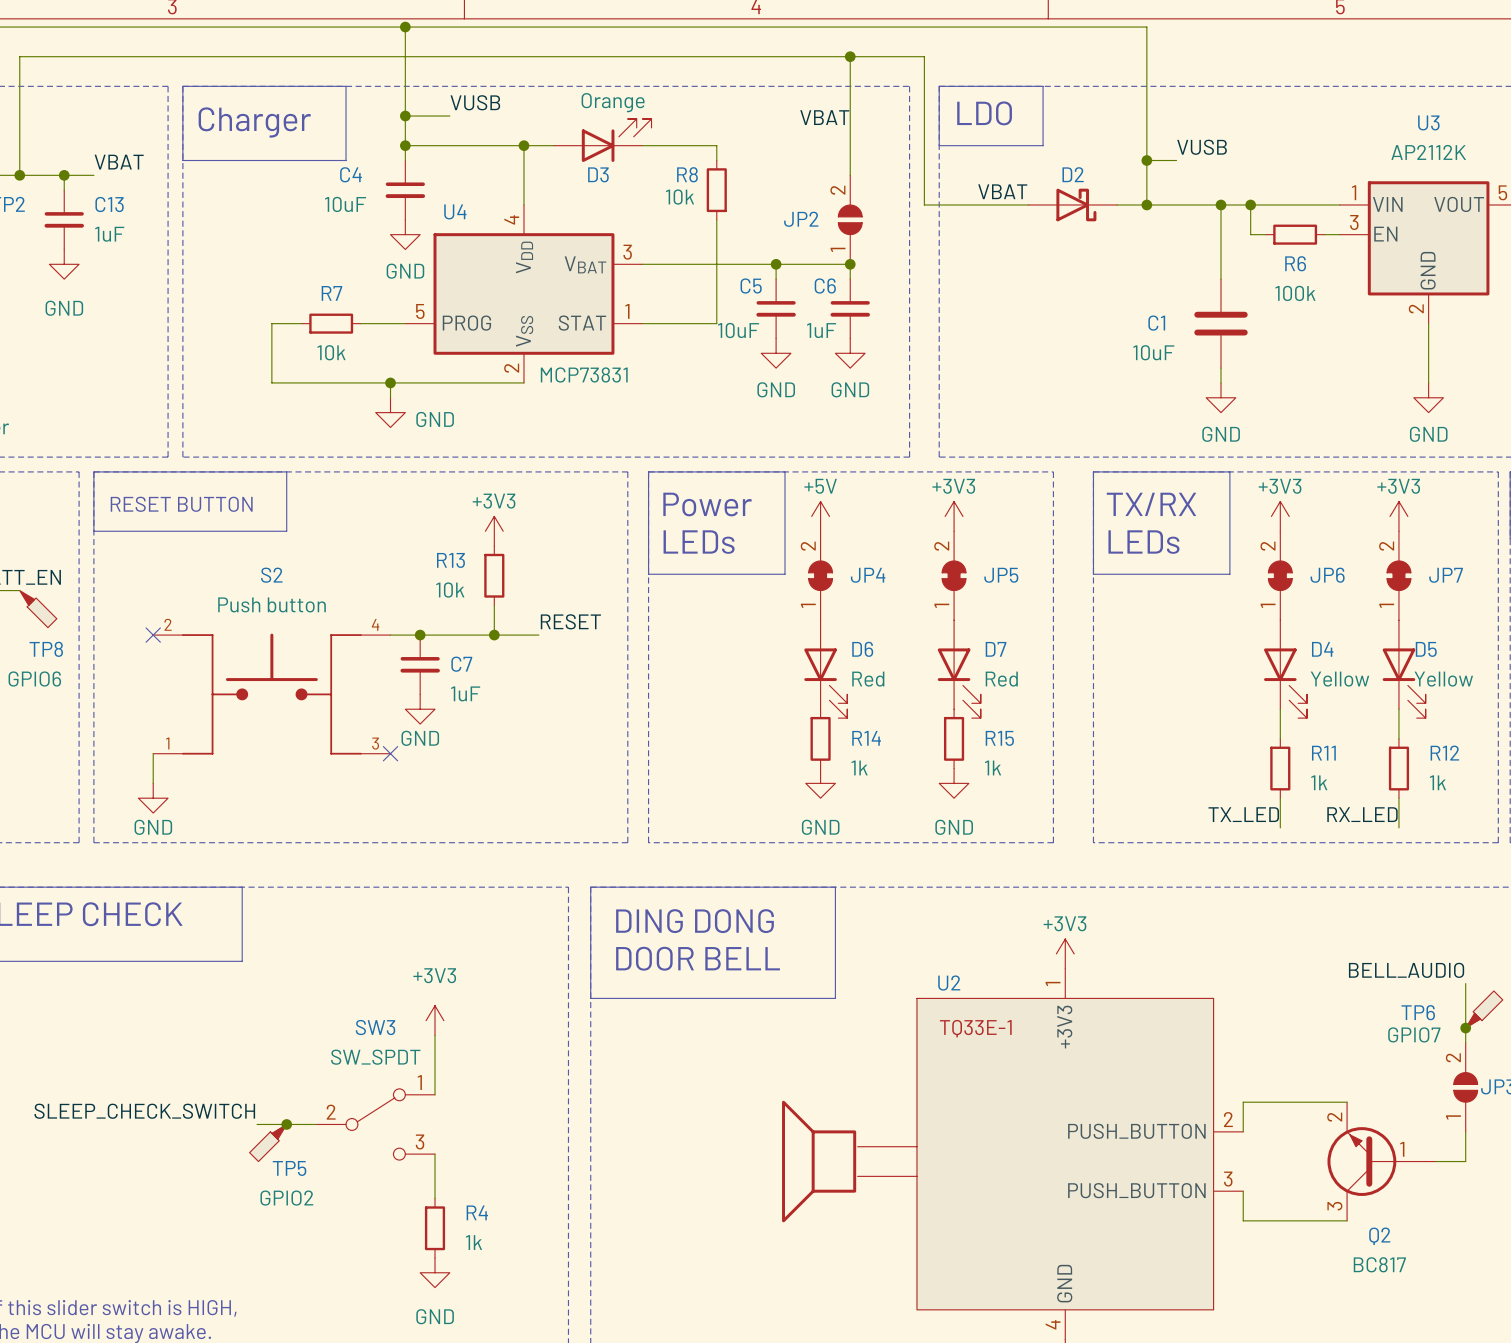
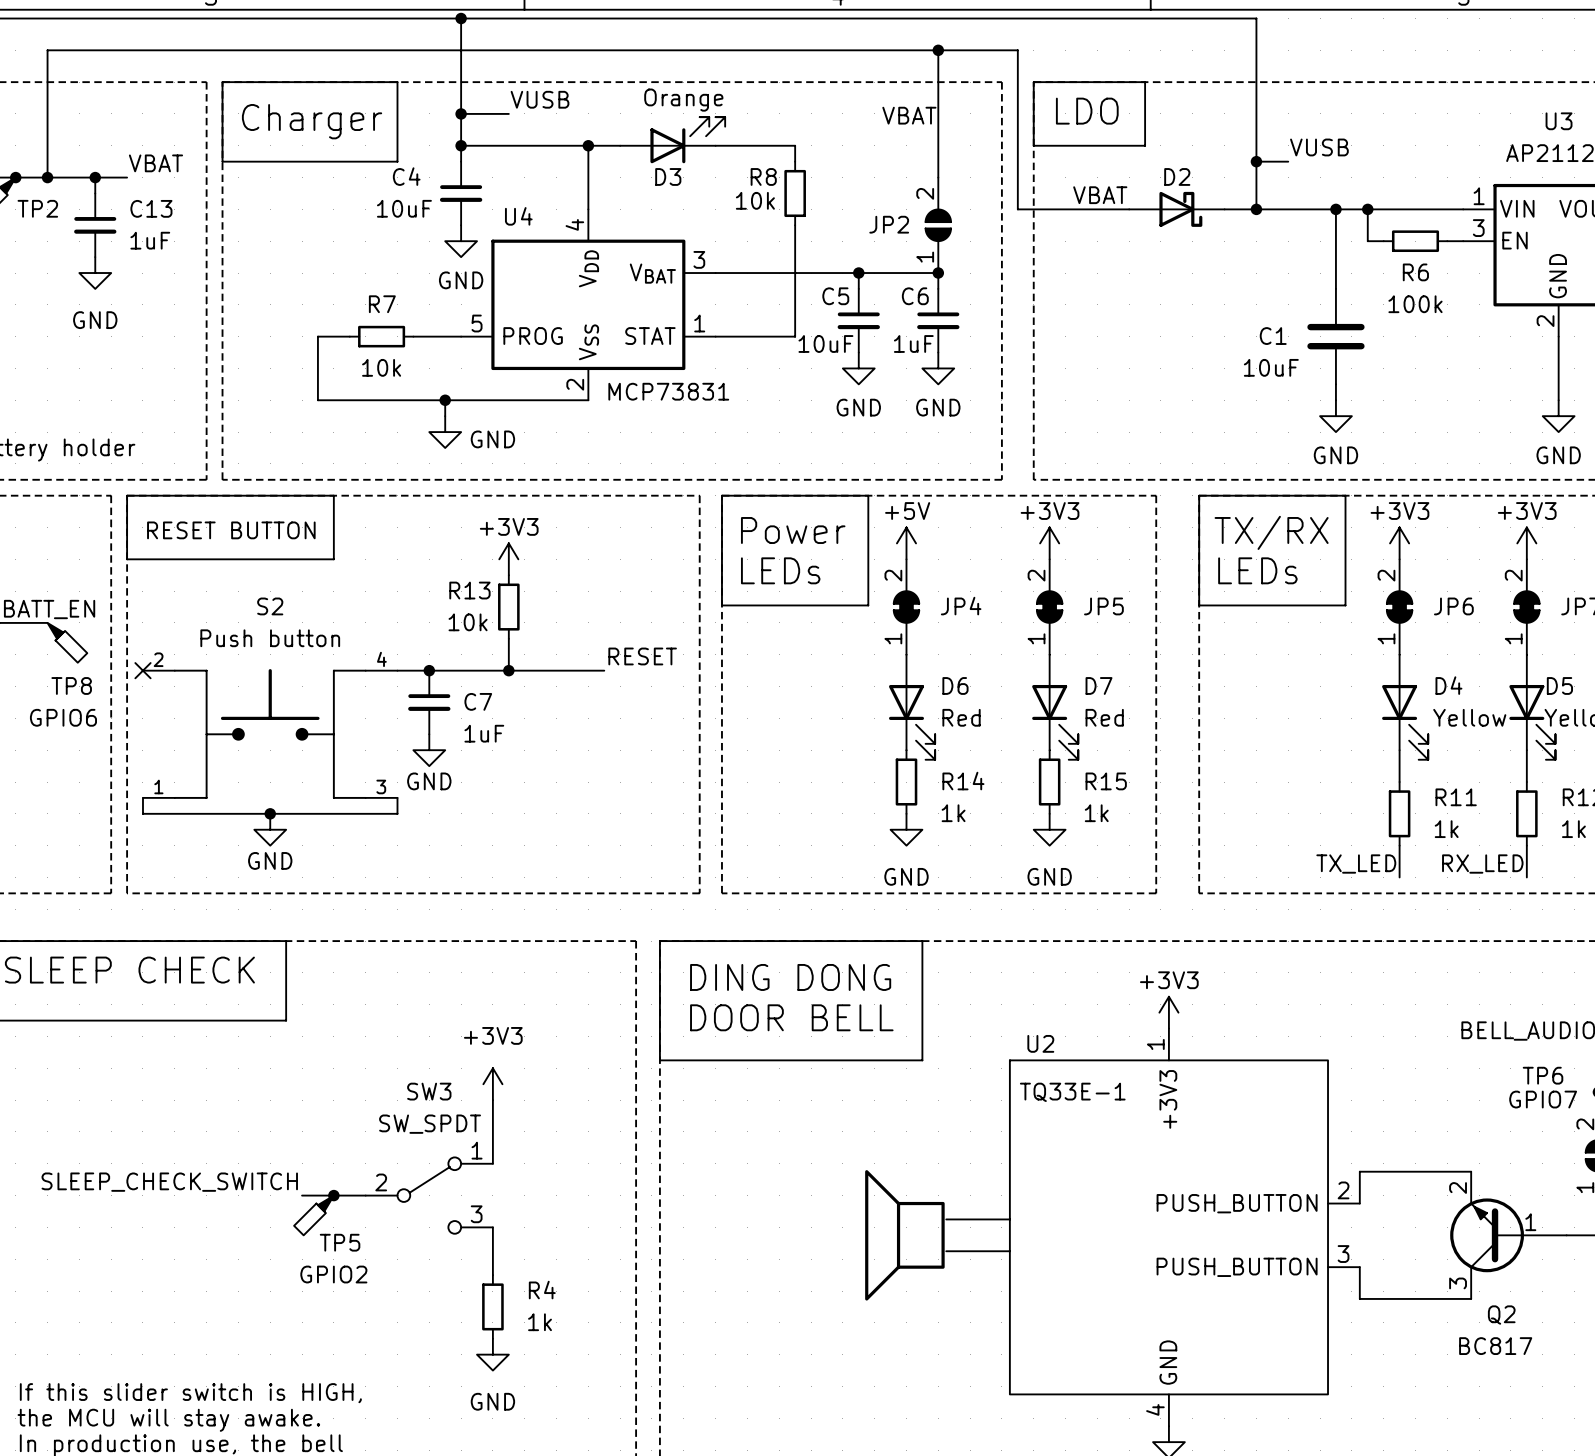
power symbol position: +3V3 (494, 531) -> +3V3 (508, 559)
R13 position: (494, 575) -> (508, 607)
wire: (494, 605) (494, 635) -> (508, 638) (508, 670)
no-connect mark position: (153, 635) -> (142, 670)
junction: none -> (429, 670)
junction: (420, 635) -> none
junction: none -> (508, 670)
junction: (494, 635) -> none
C7 position: (420, 664) -> (429, 702)
S2 position: (271, 694) -> (270, 733)
power symbol position: GND (420, 709) -> GND (429, 750)
wire: none -> (142, 797) (142, 813) (397, 813) (397, 797)
wire: (153, 753) (153, 783) -> none
no-connect mark: (390, 753) -> none
junction: none -> (270, 813)
power symbol position: GND (153, 798) -> GND (270, 829)

